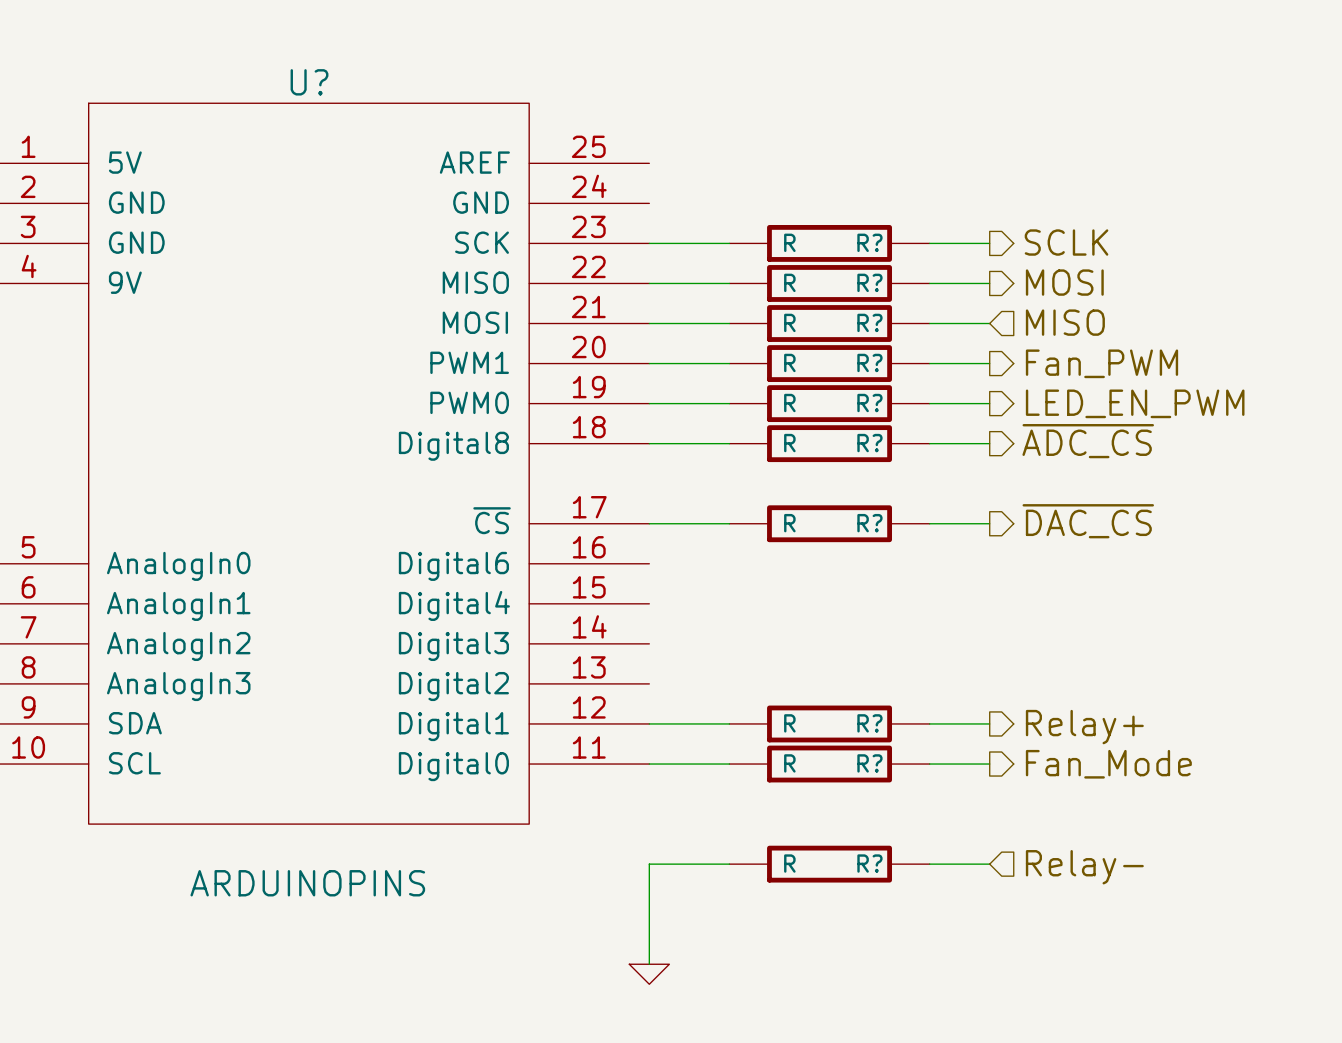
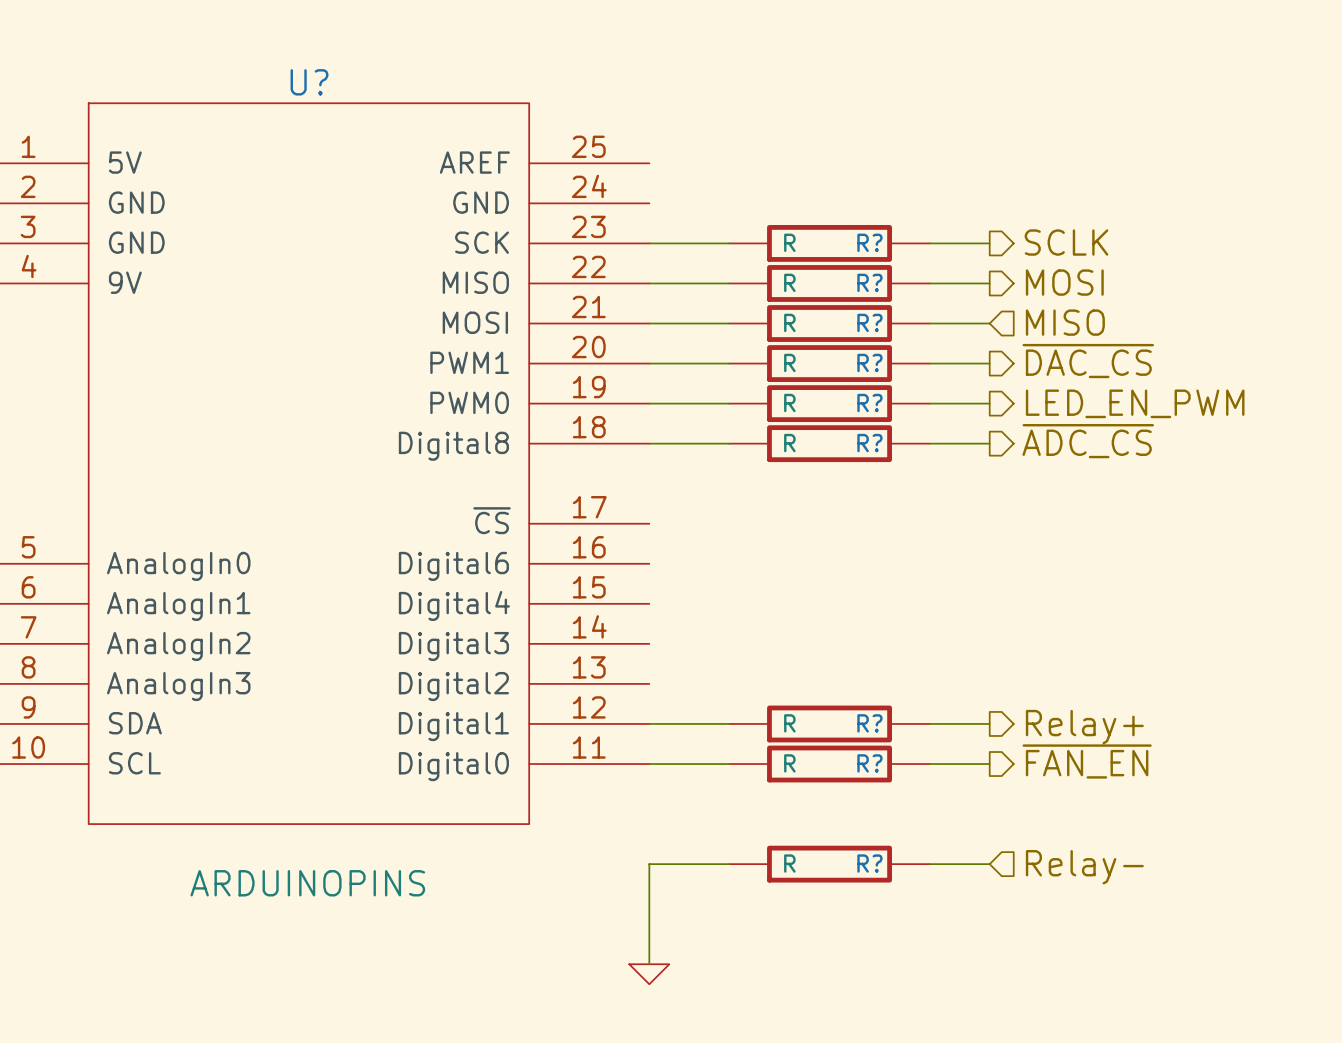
hierarchical label: Fan_PWM (1101, 363) -> ~{DAC_CS} (1088, 361)
hierarchical label: ~{DAC_CS} (1088, 521) -> none
wire: (649, 523) (729, 523) -> none
R?: R (829, 523) -> none
wire: (929, 523) (989, 523) -> none
hierarchical label: Fan_Mode (1108, 764) -> ~{FAN_EN} (1087, 761)

